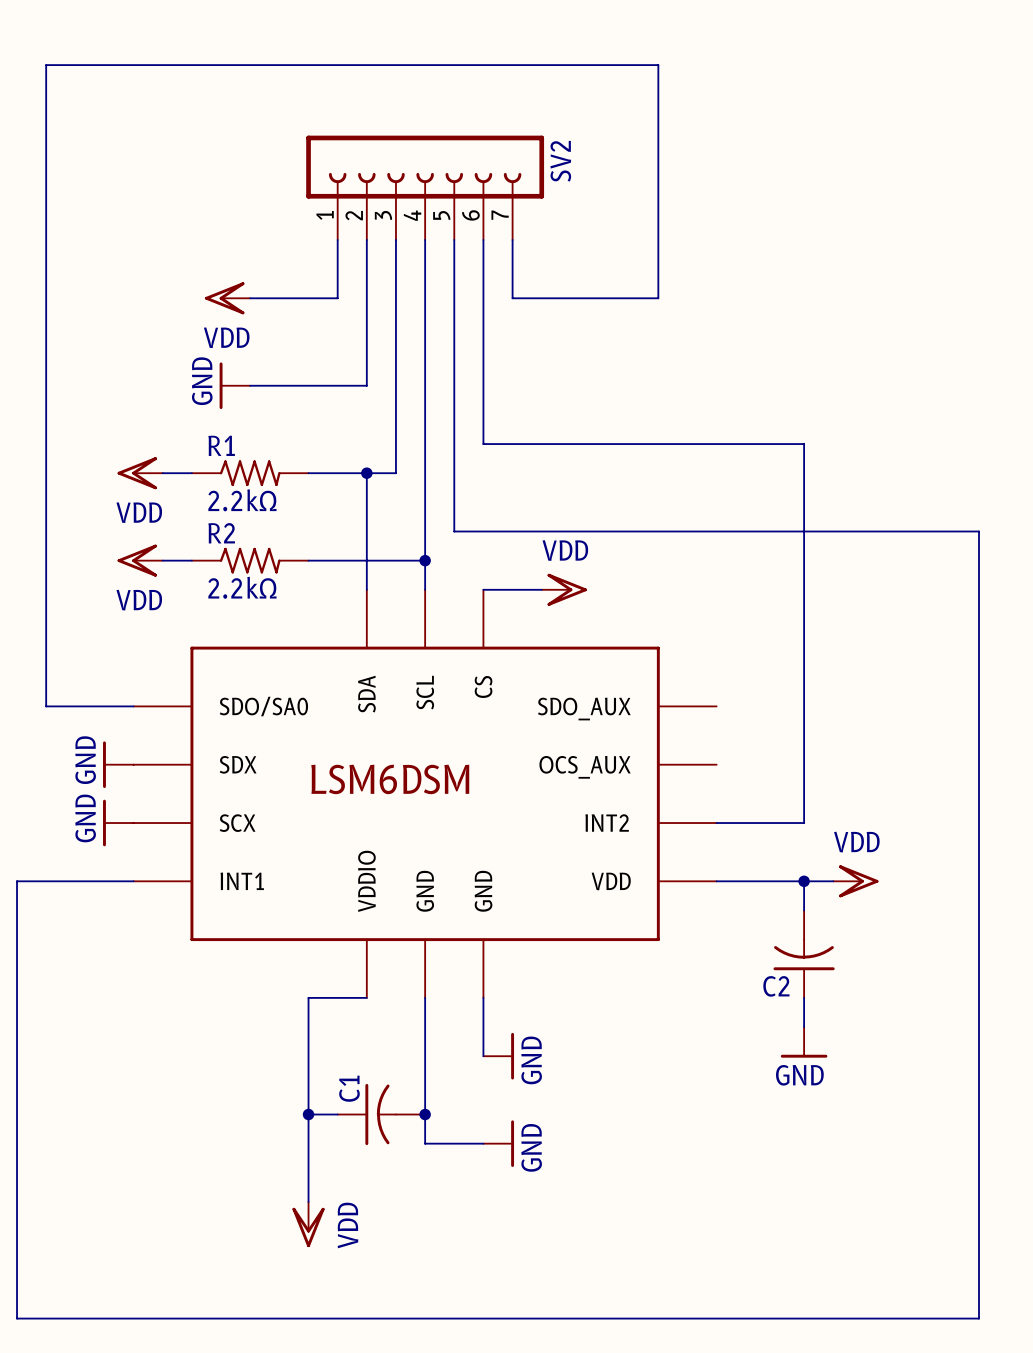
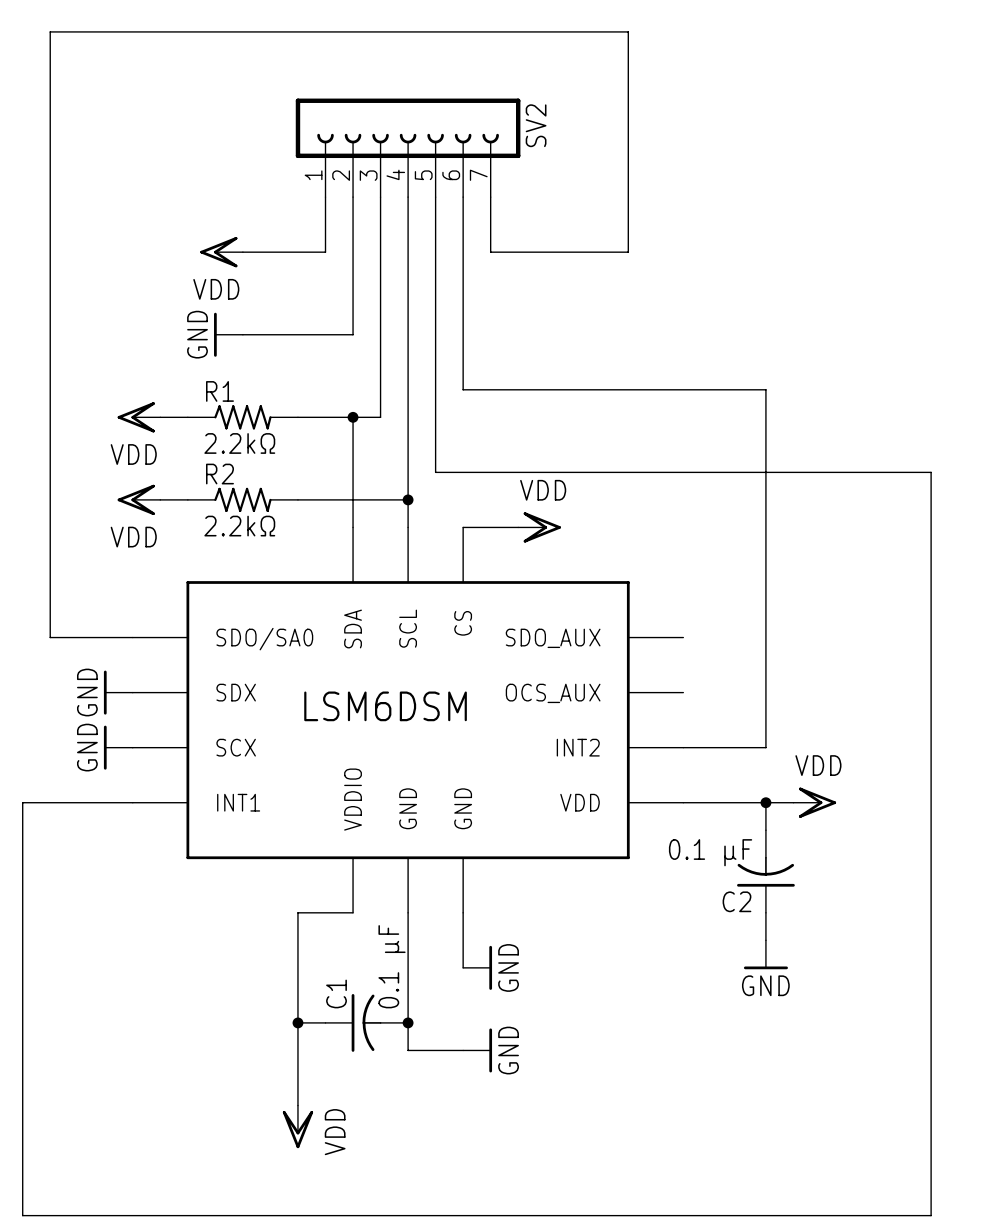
C2 value: none -> 0.1 μF (710, 852)
C1 value: none -> 0.1 μF (392, 966)

